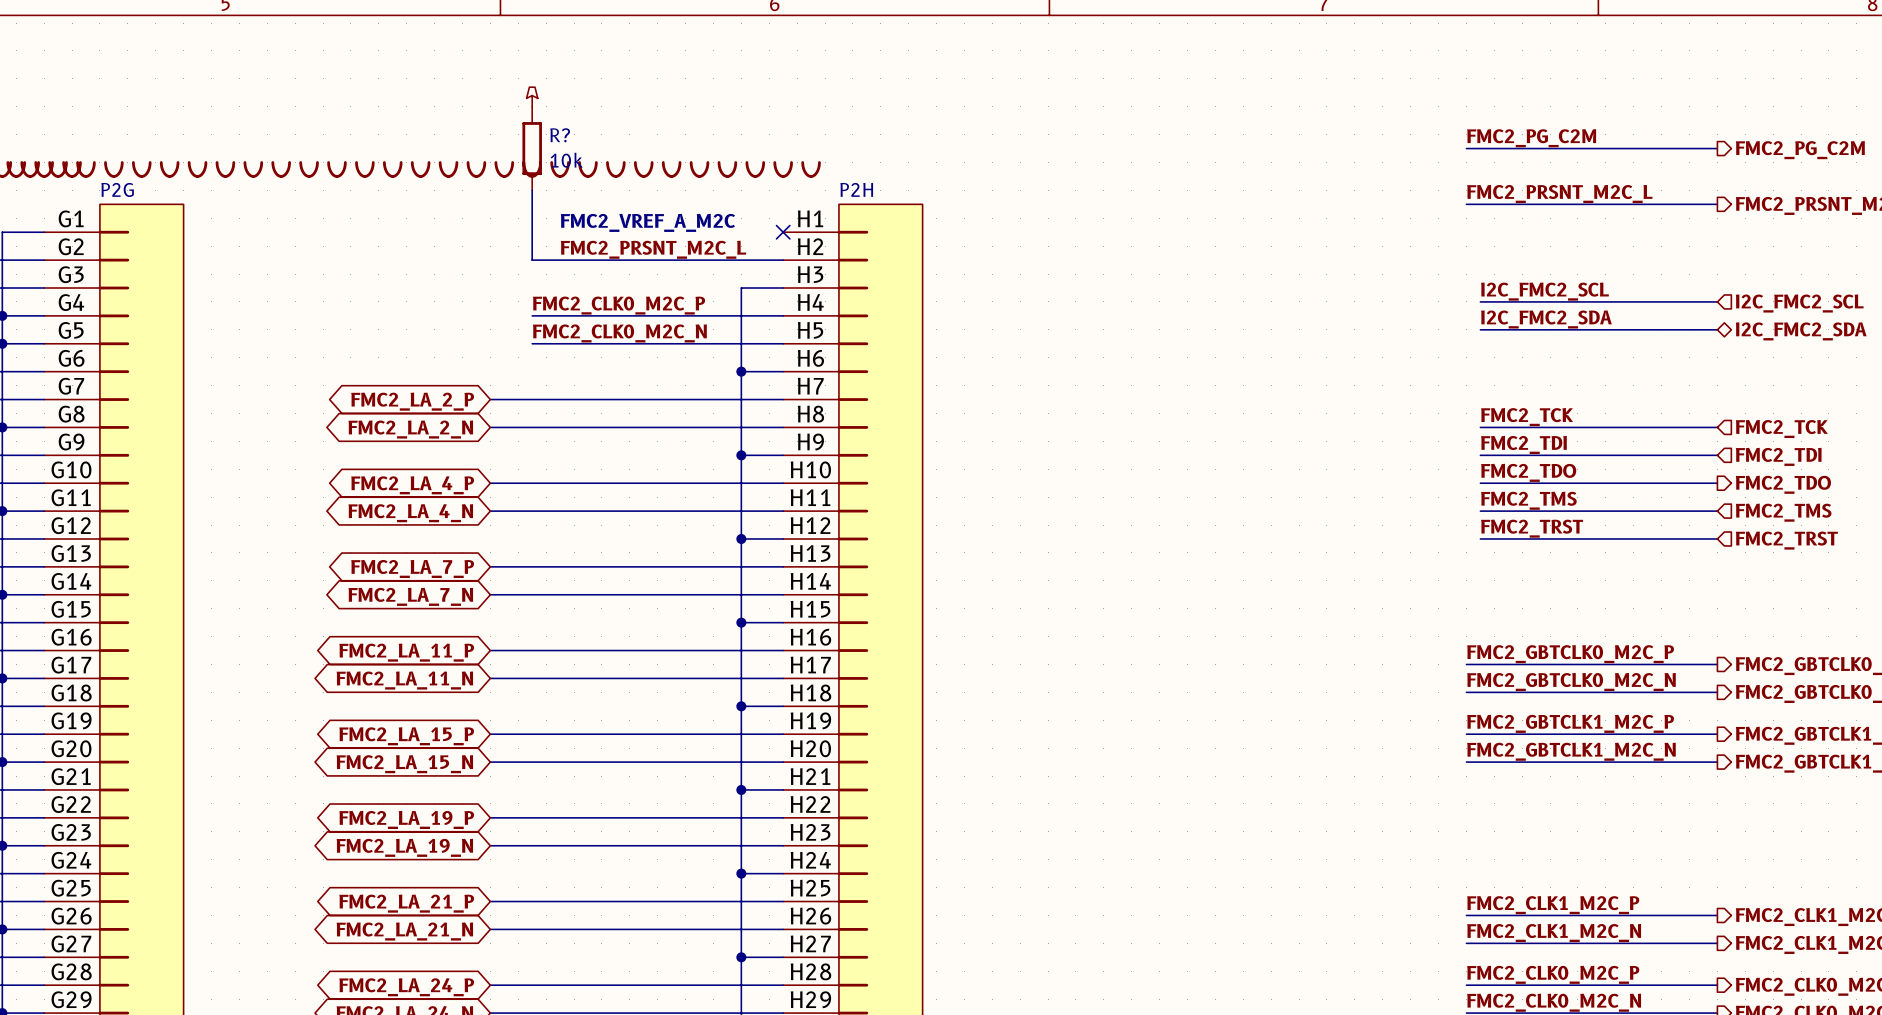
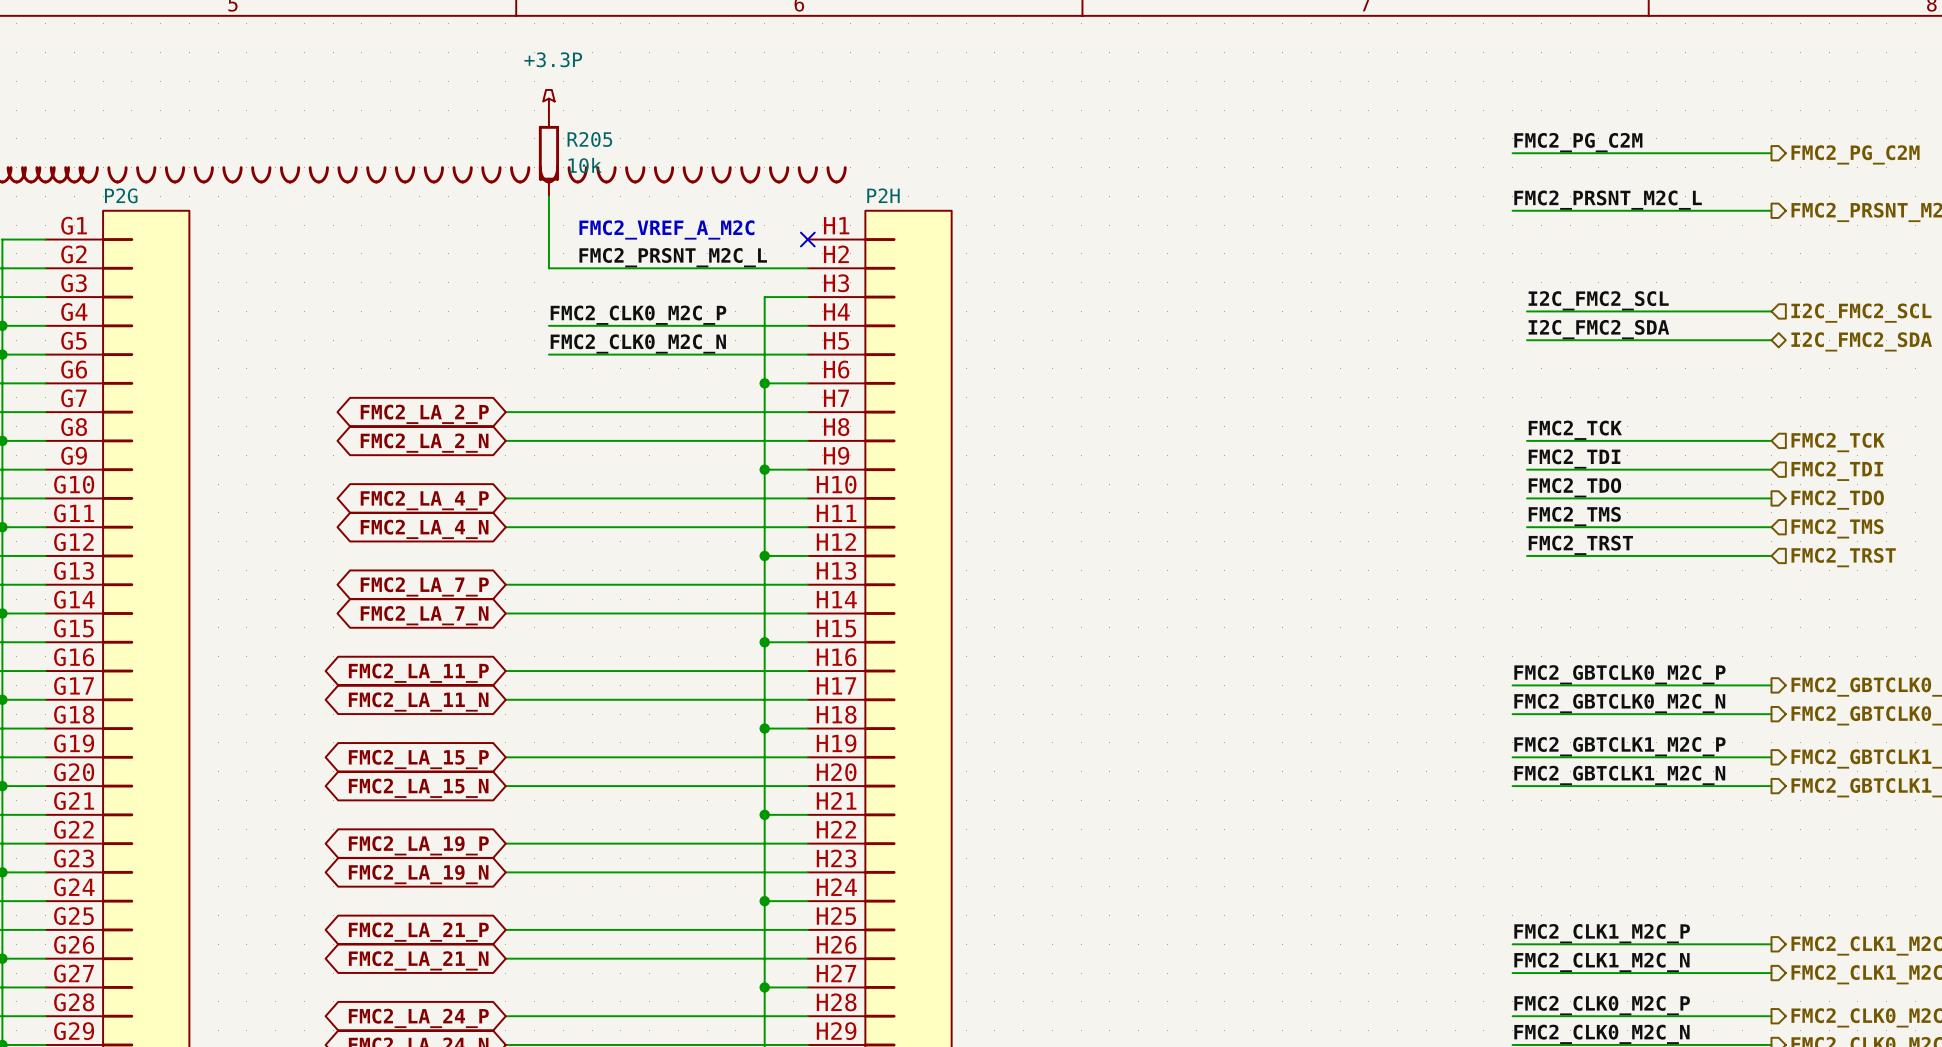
power symbol text: none -> +3.3P (553, 59)
R? name: R? (560, 135) -> R205 (589, 139)

